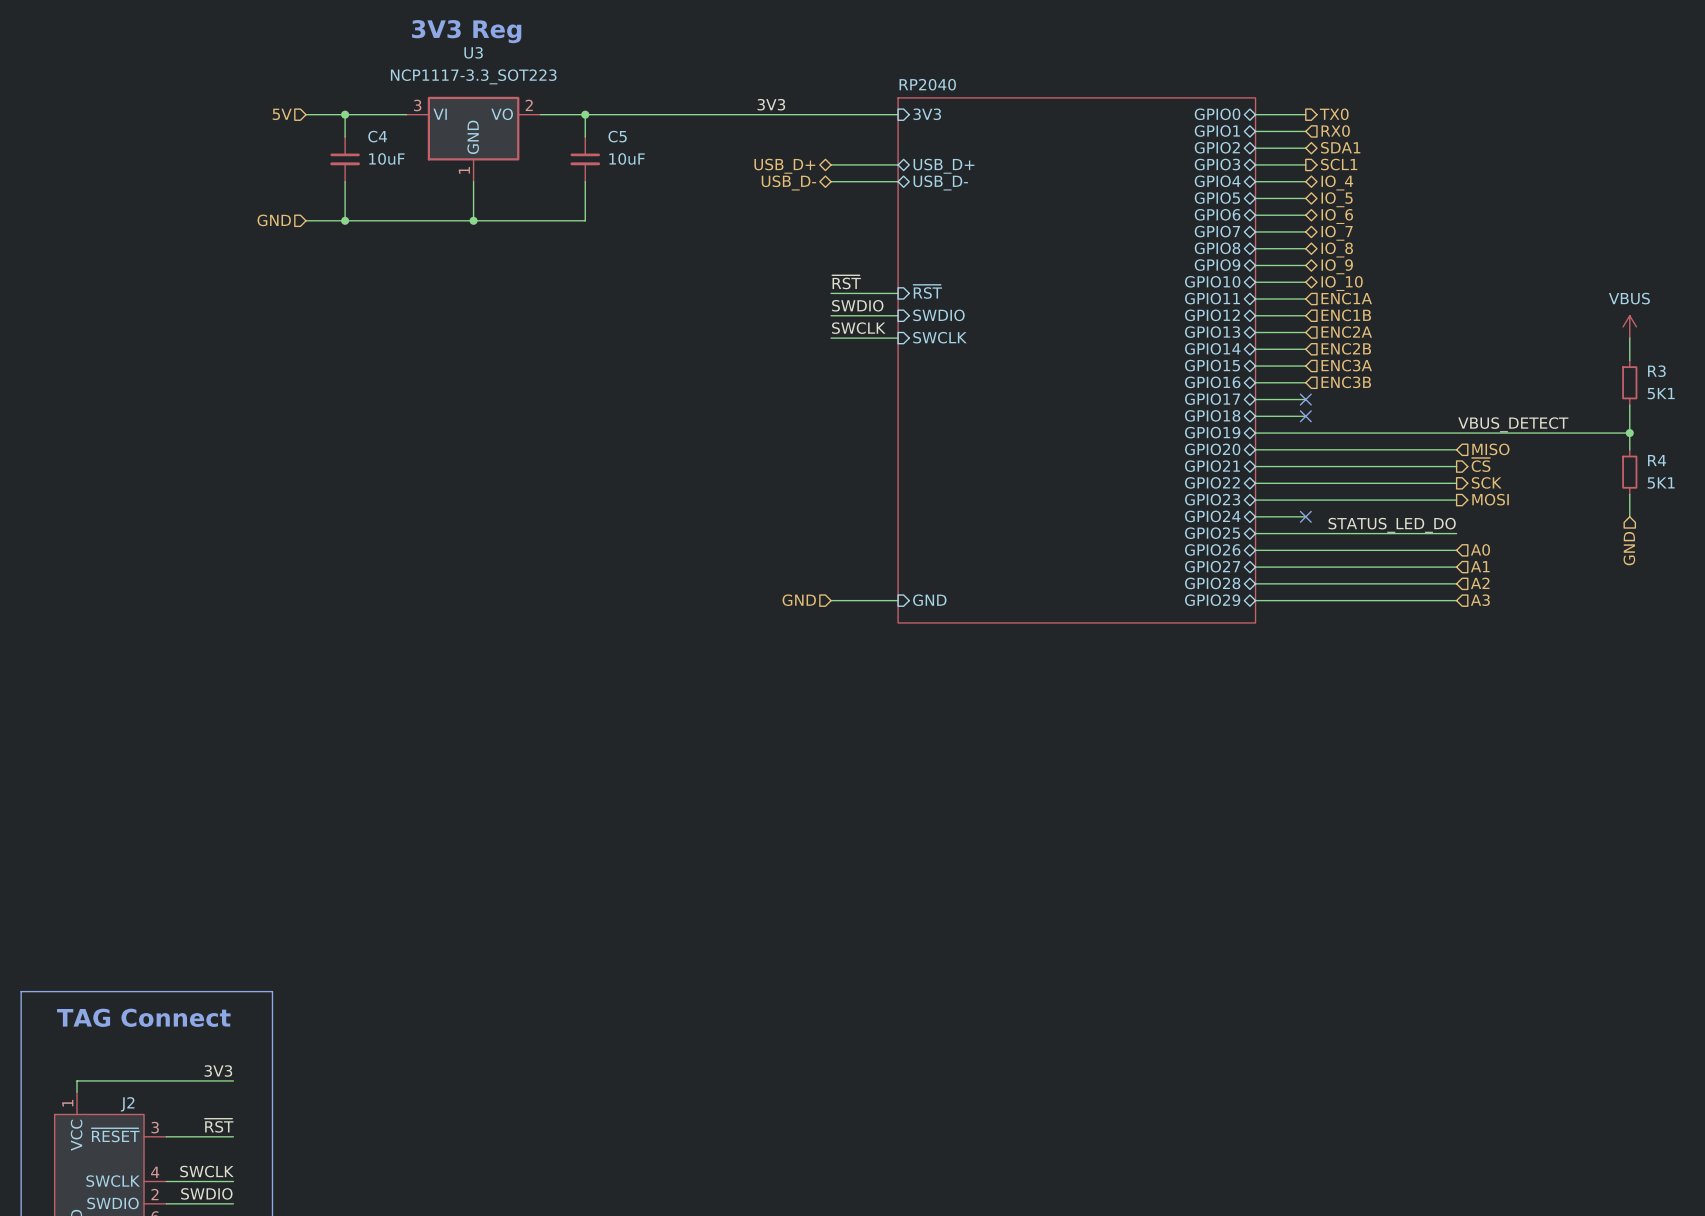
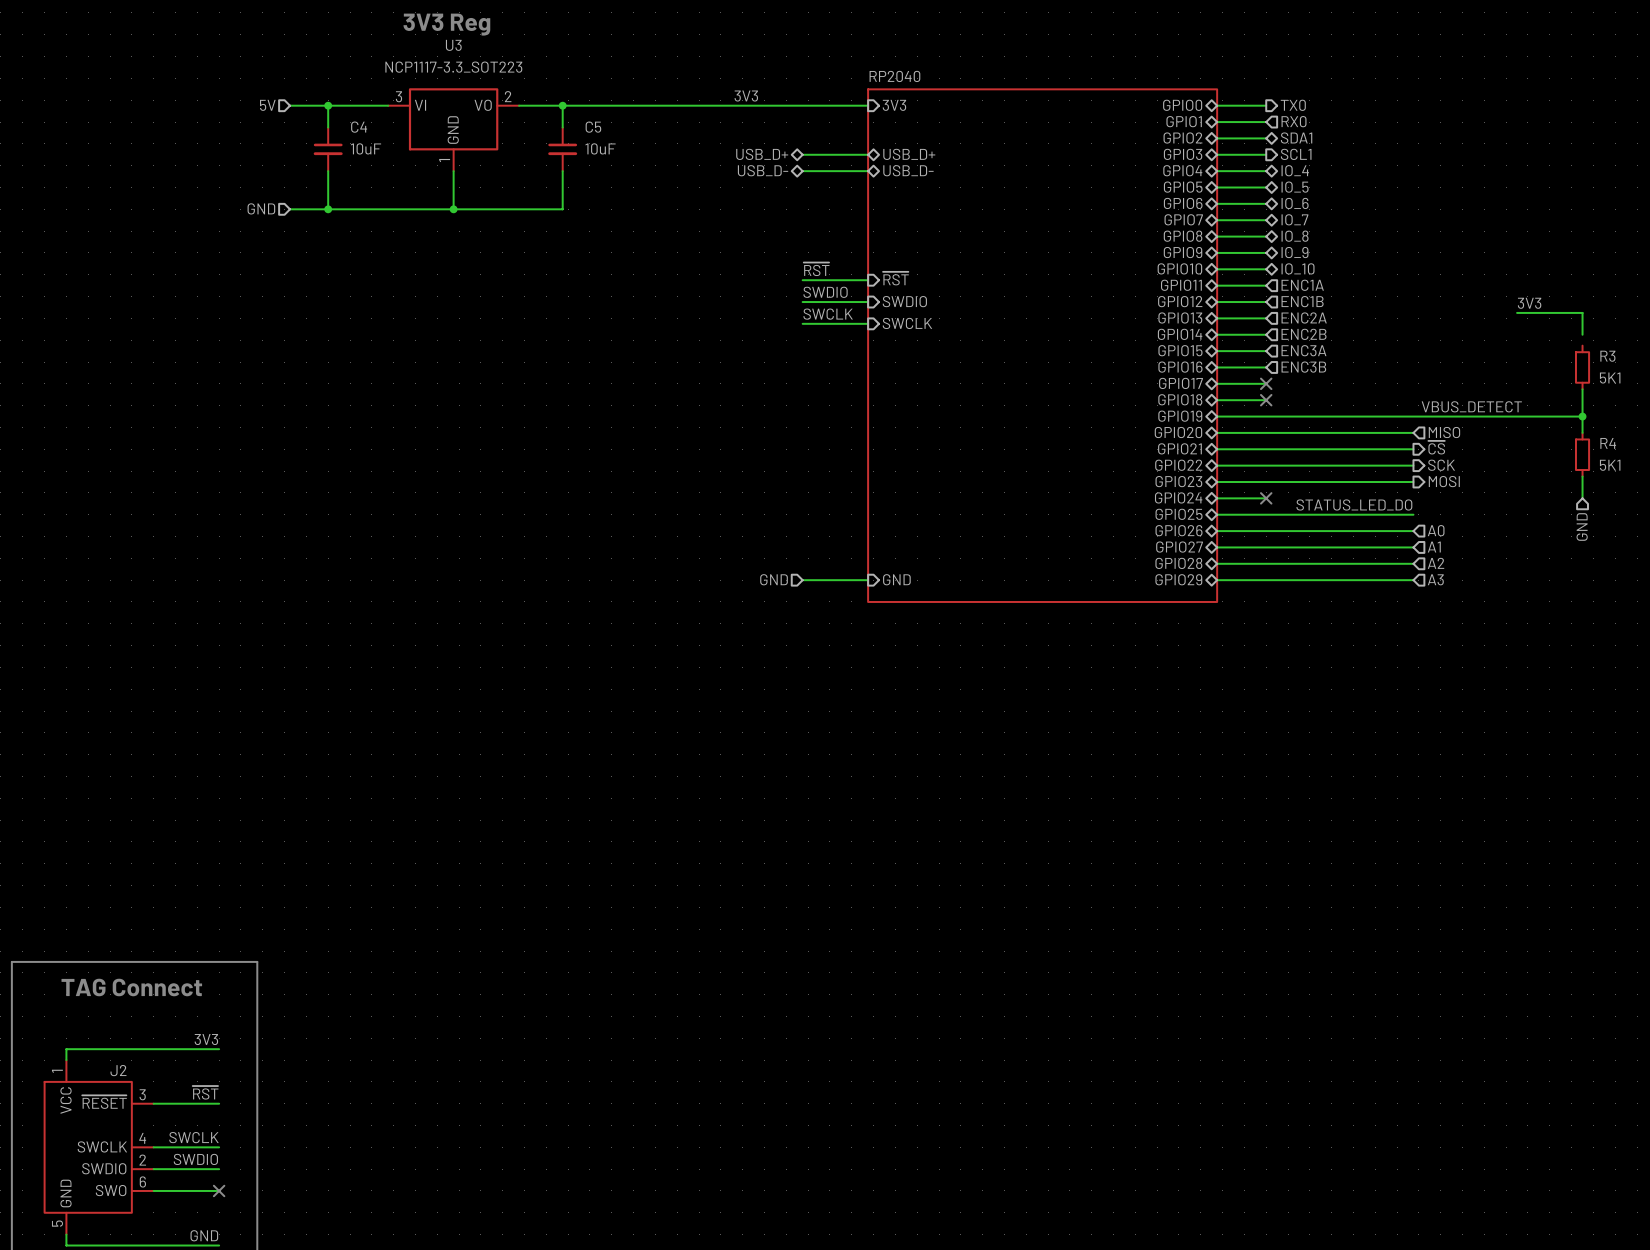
label: none -> 3V3 (1529, 303)
wire: none -> (1517, 312) (1582, 312) (1582, 323)
power symbol: VBUS (1629, 326) -> none
wire: (1629, 349) (1629, 360) -> none

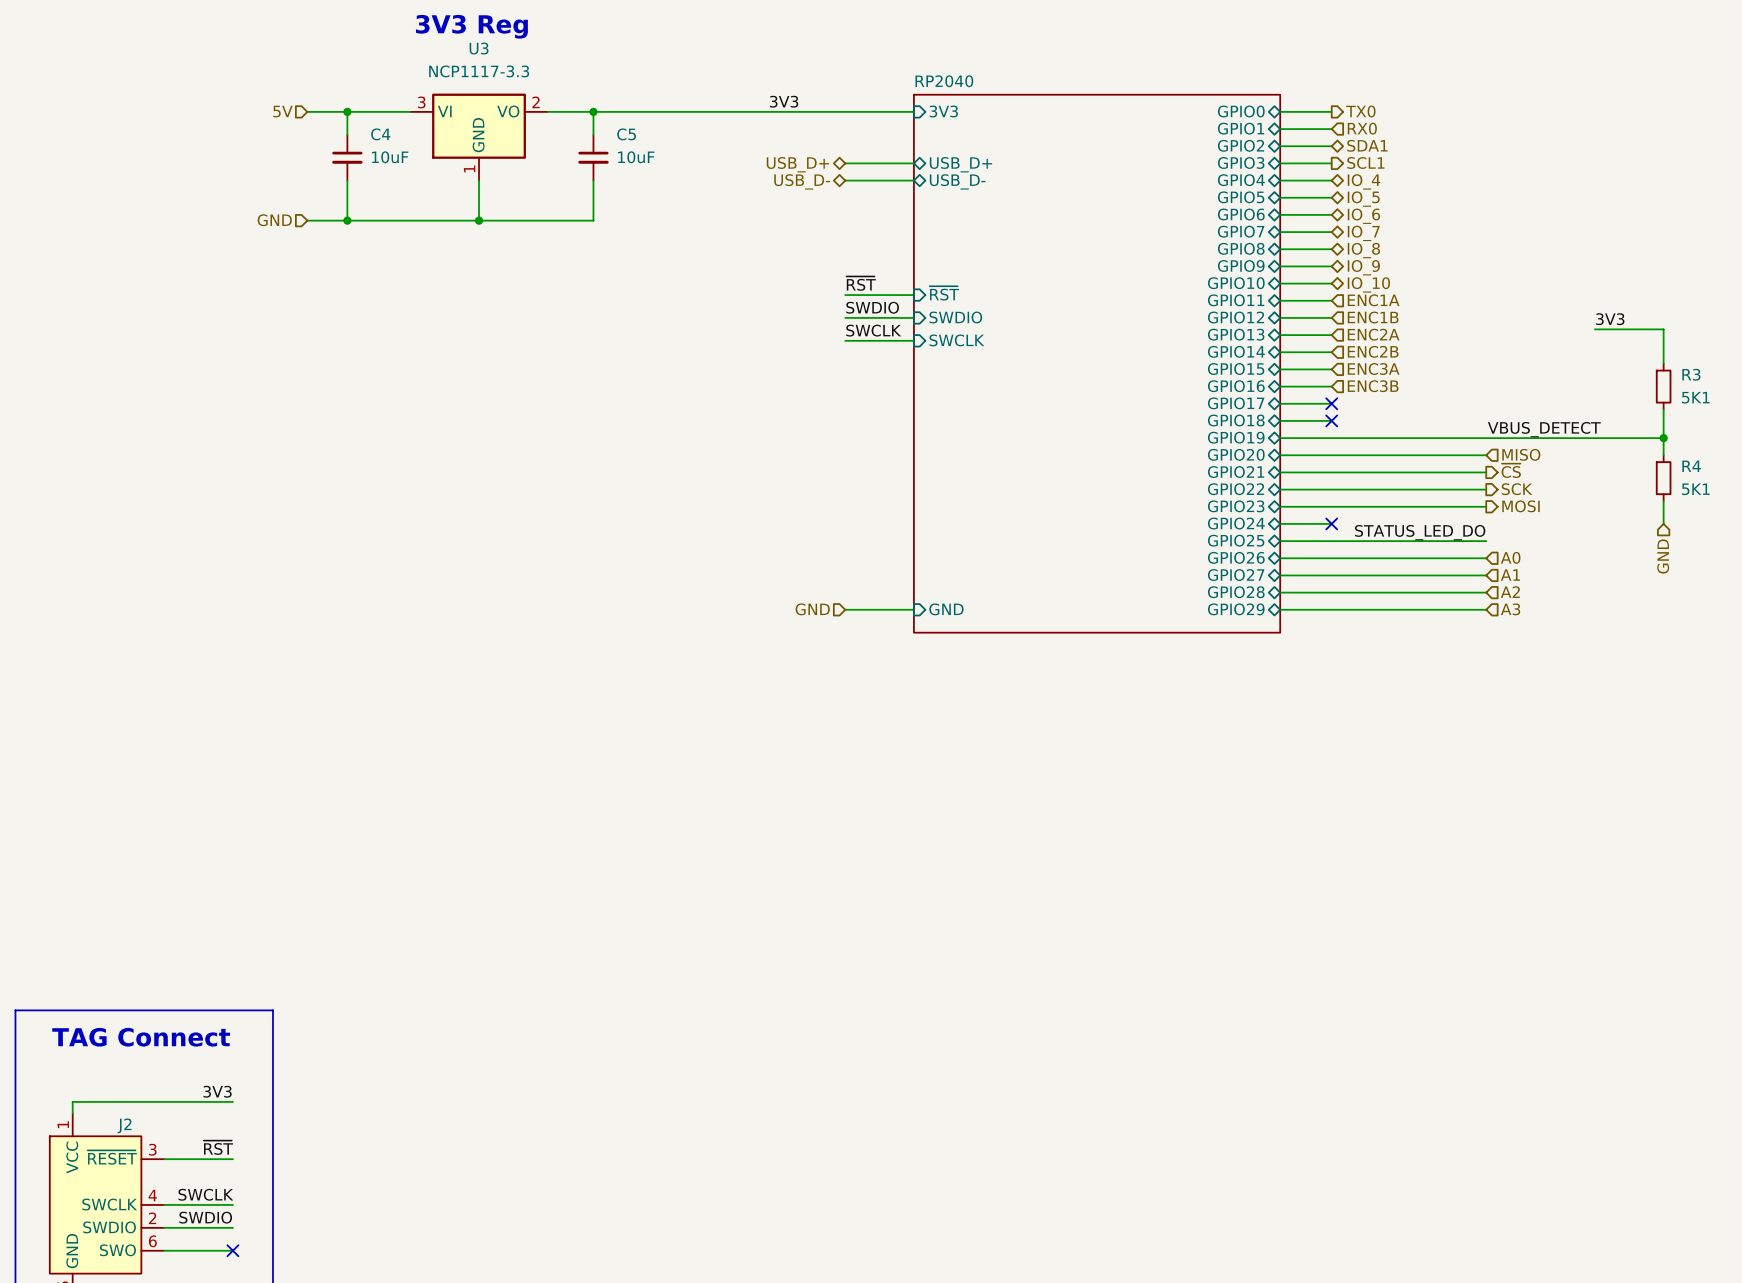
U3 value: NCP1117-3.3_SOT223 (453, 67) -> NCP1117-3.3 (479, 71)
wire: none -> (1663, 352) (1663, 363)

